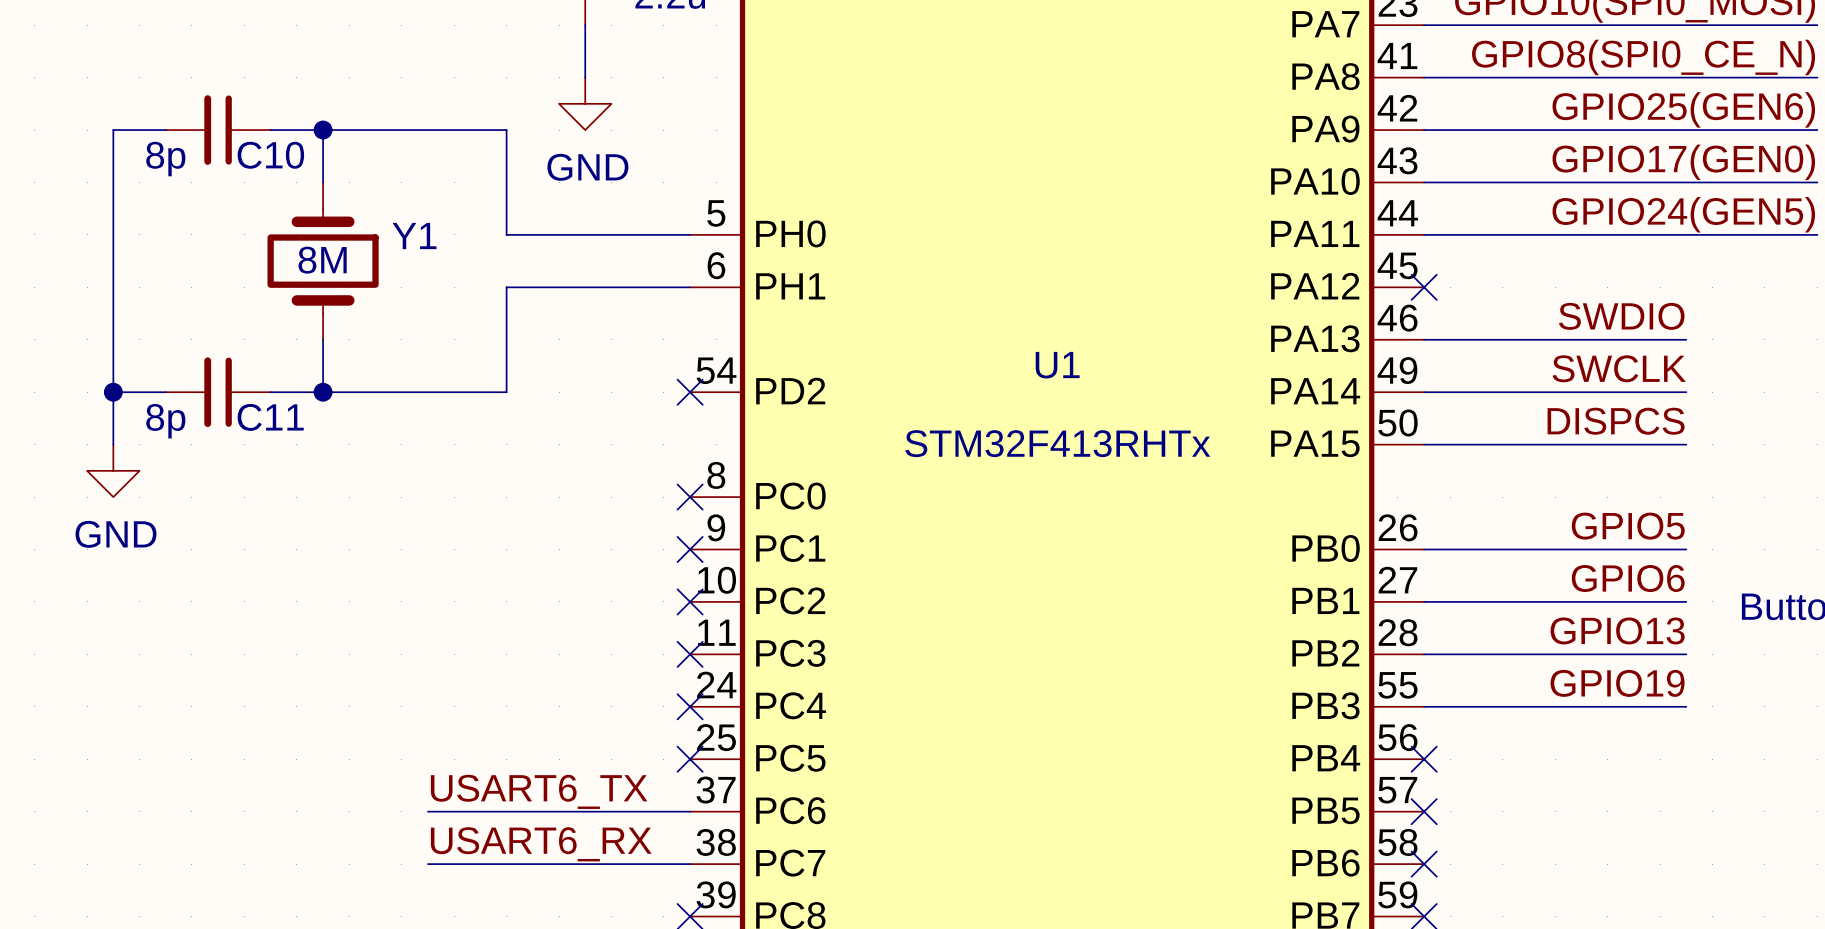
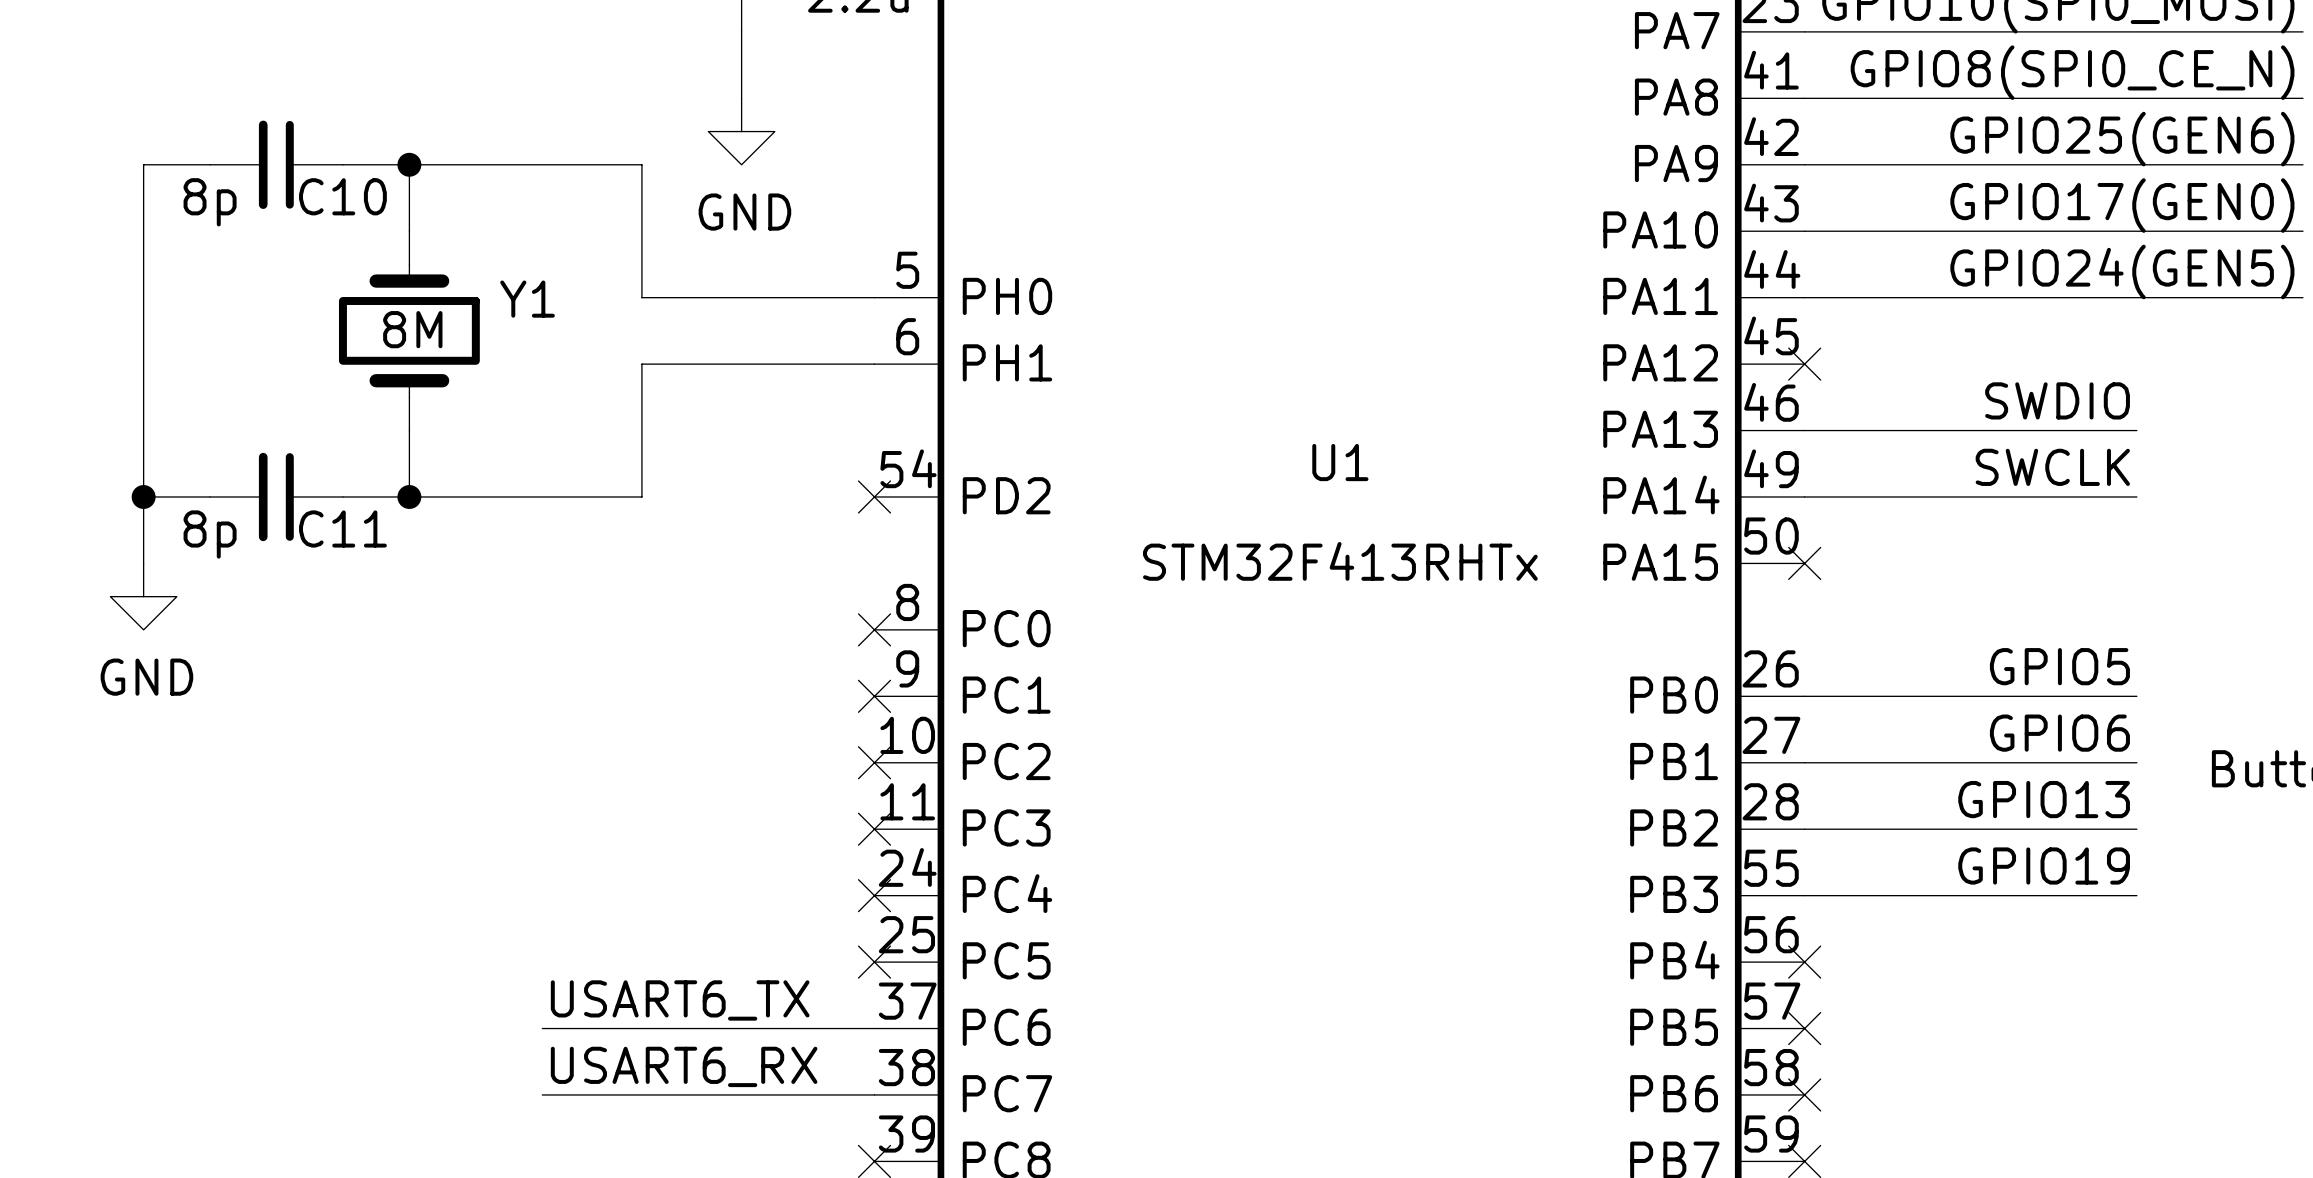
label: DISPCS (1616, 421) -> none
wire: (1424, 444) (1686, 444) -> none
no-connect mark: none -> (1804, 563)

